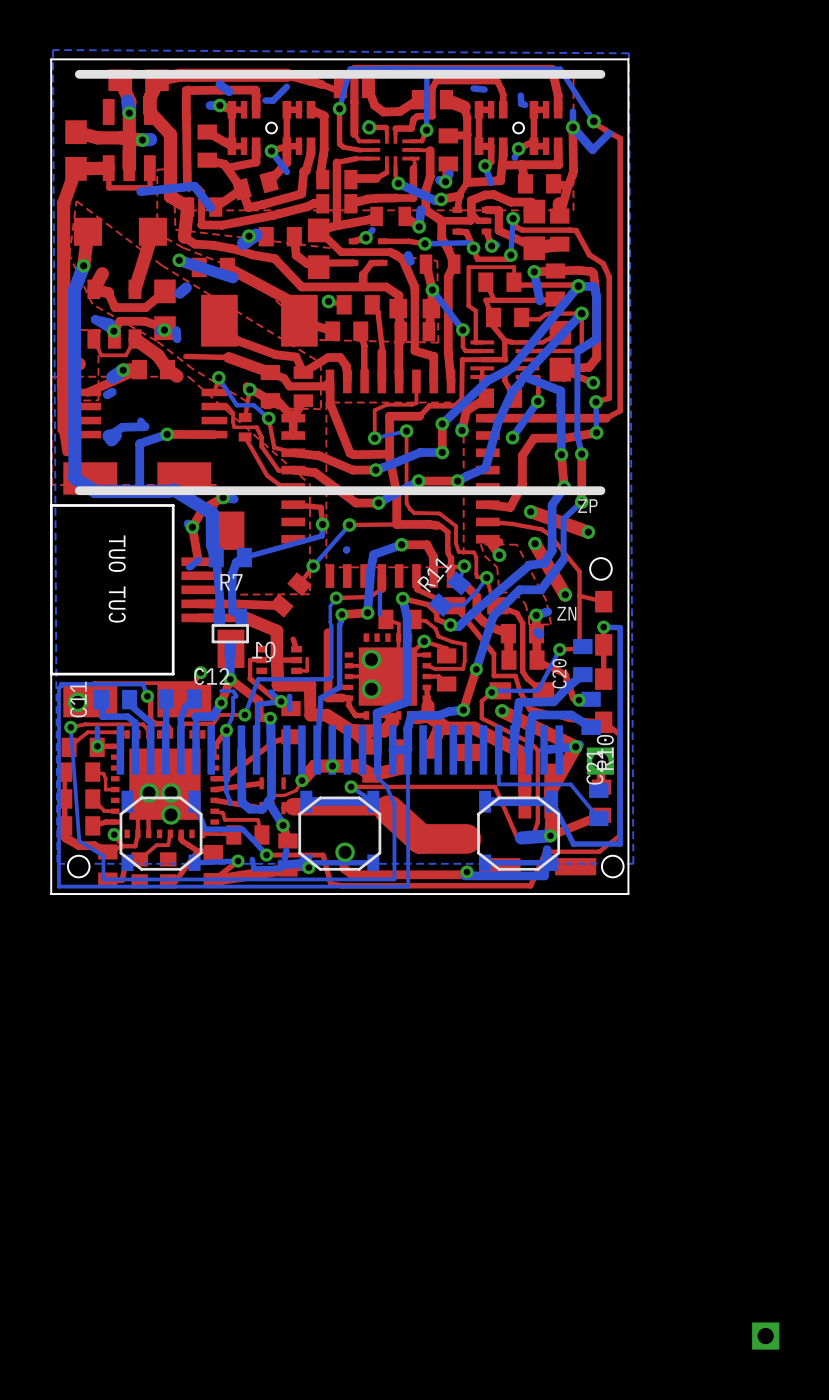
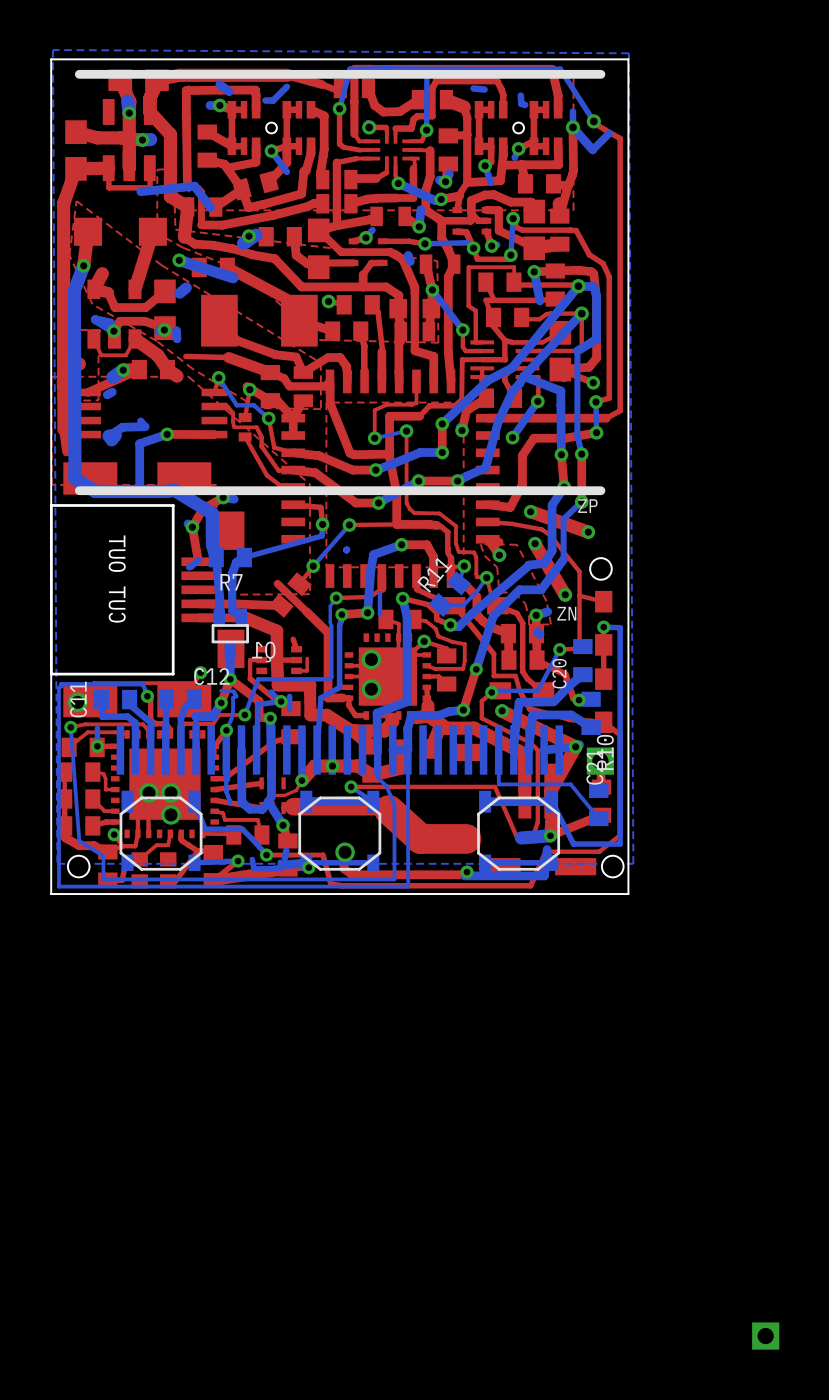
top track: none -> (277, 583) (328, 632)

